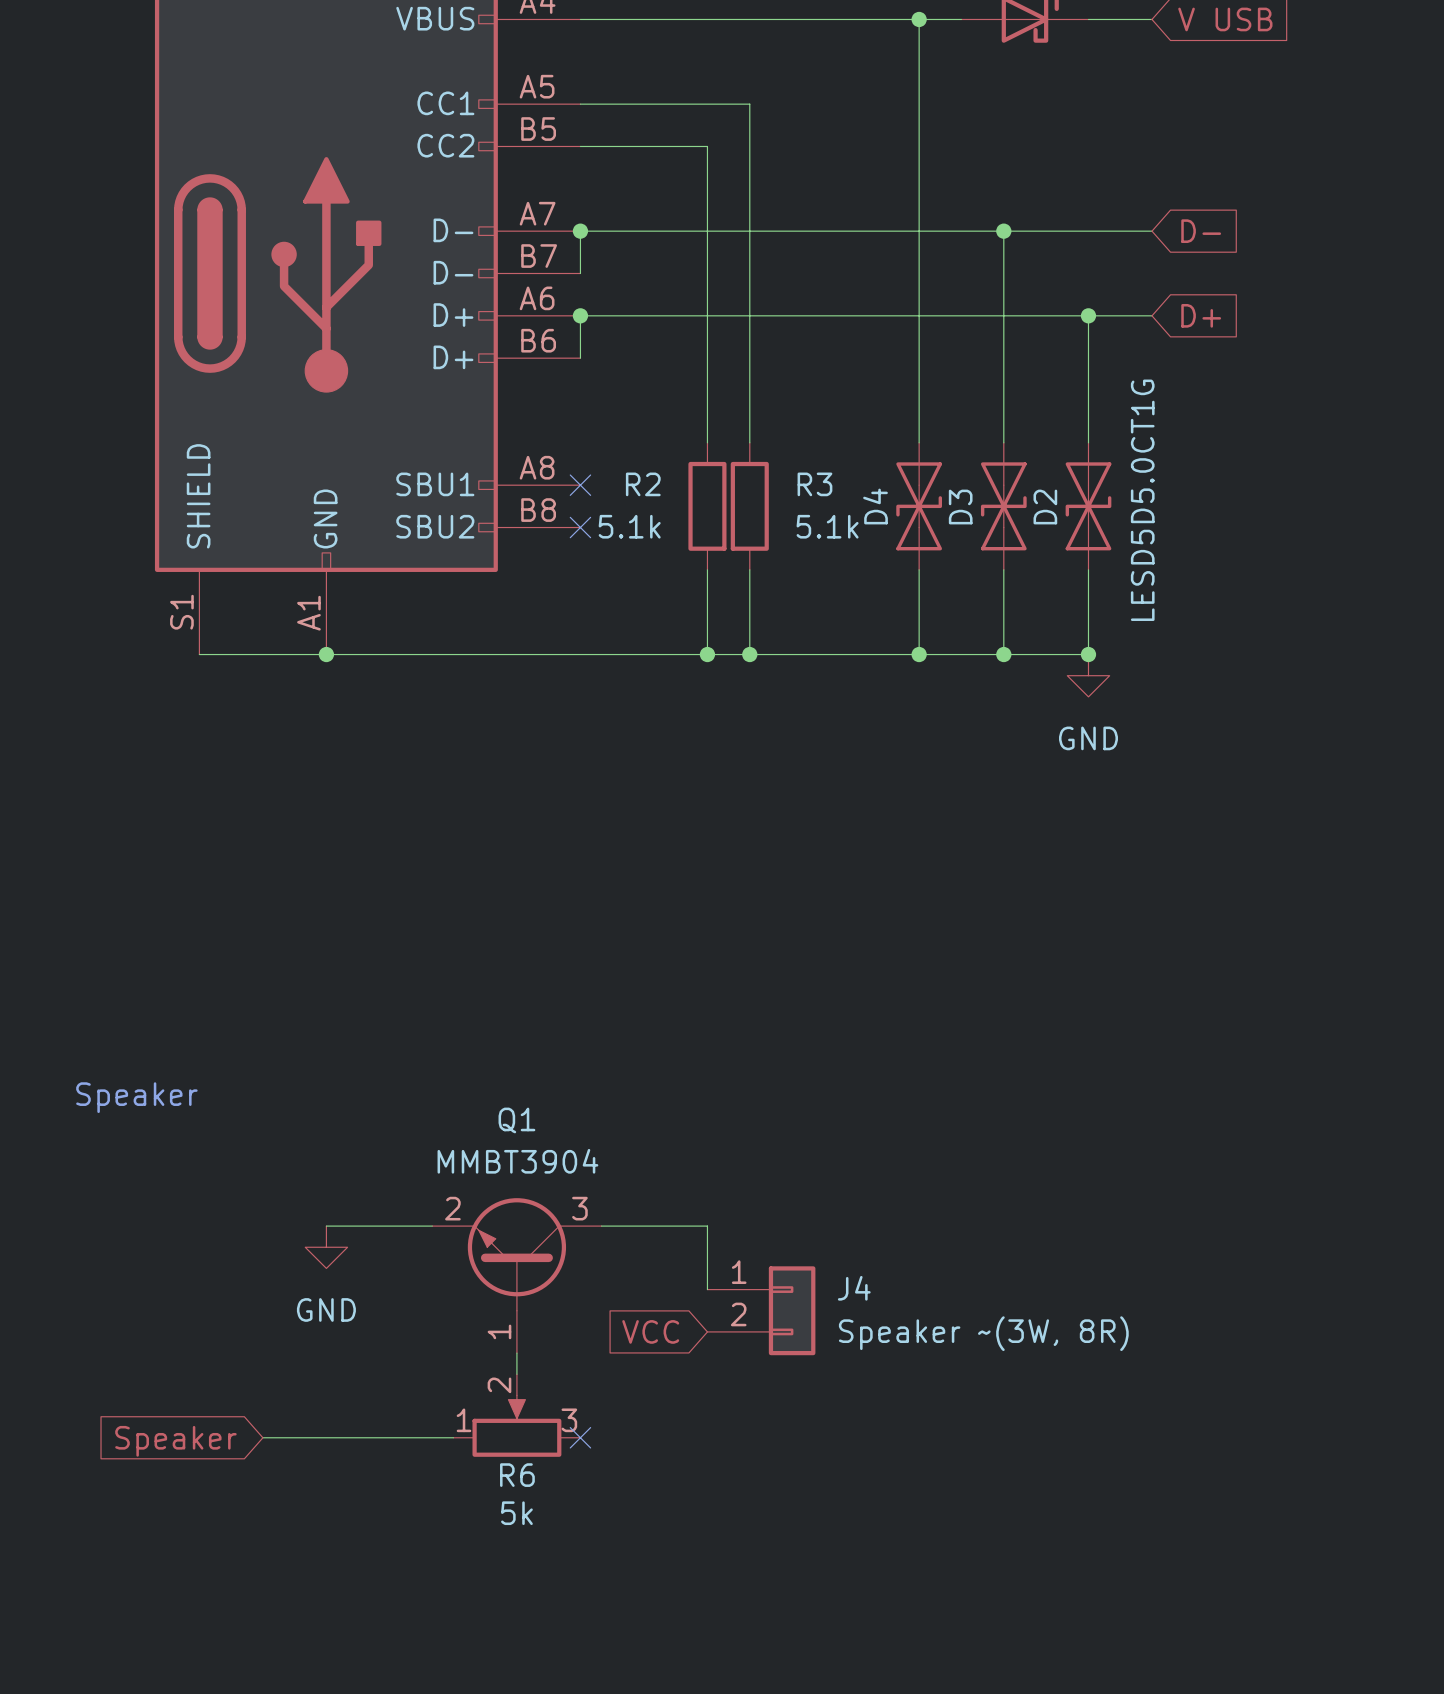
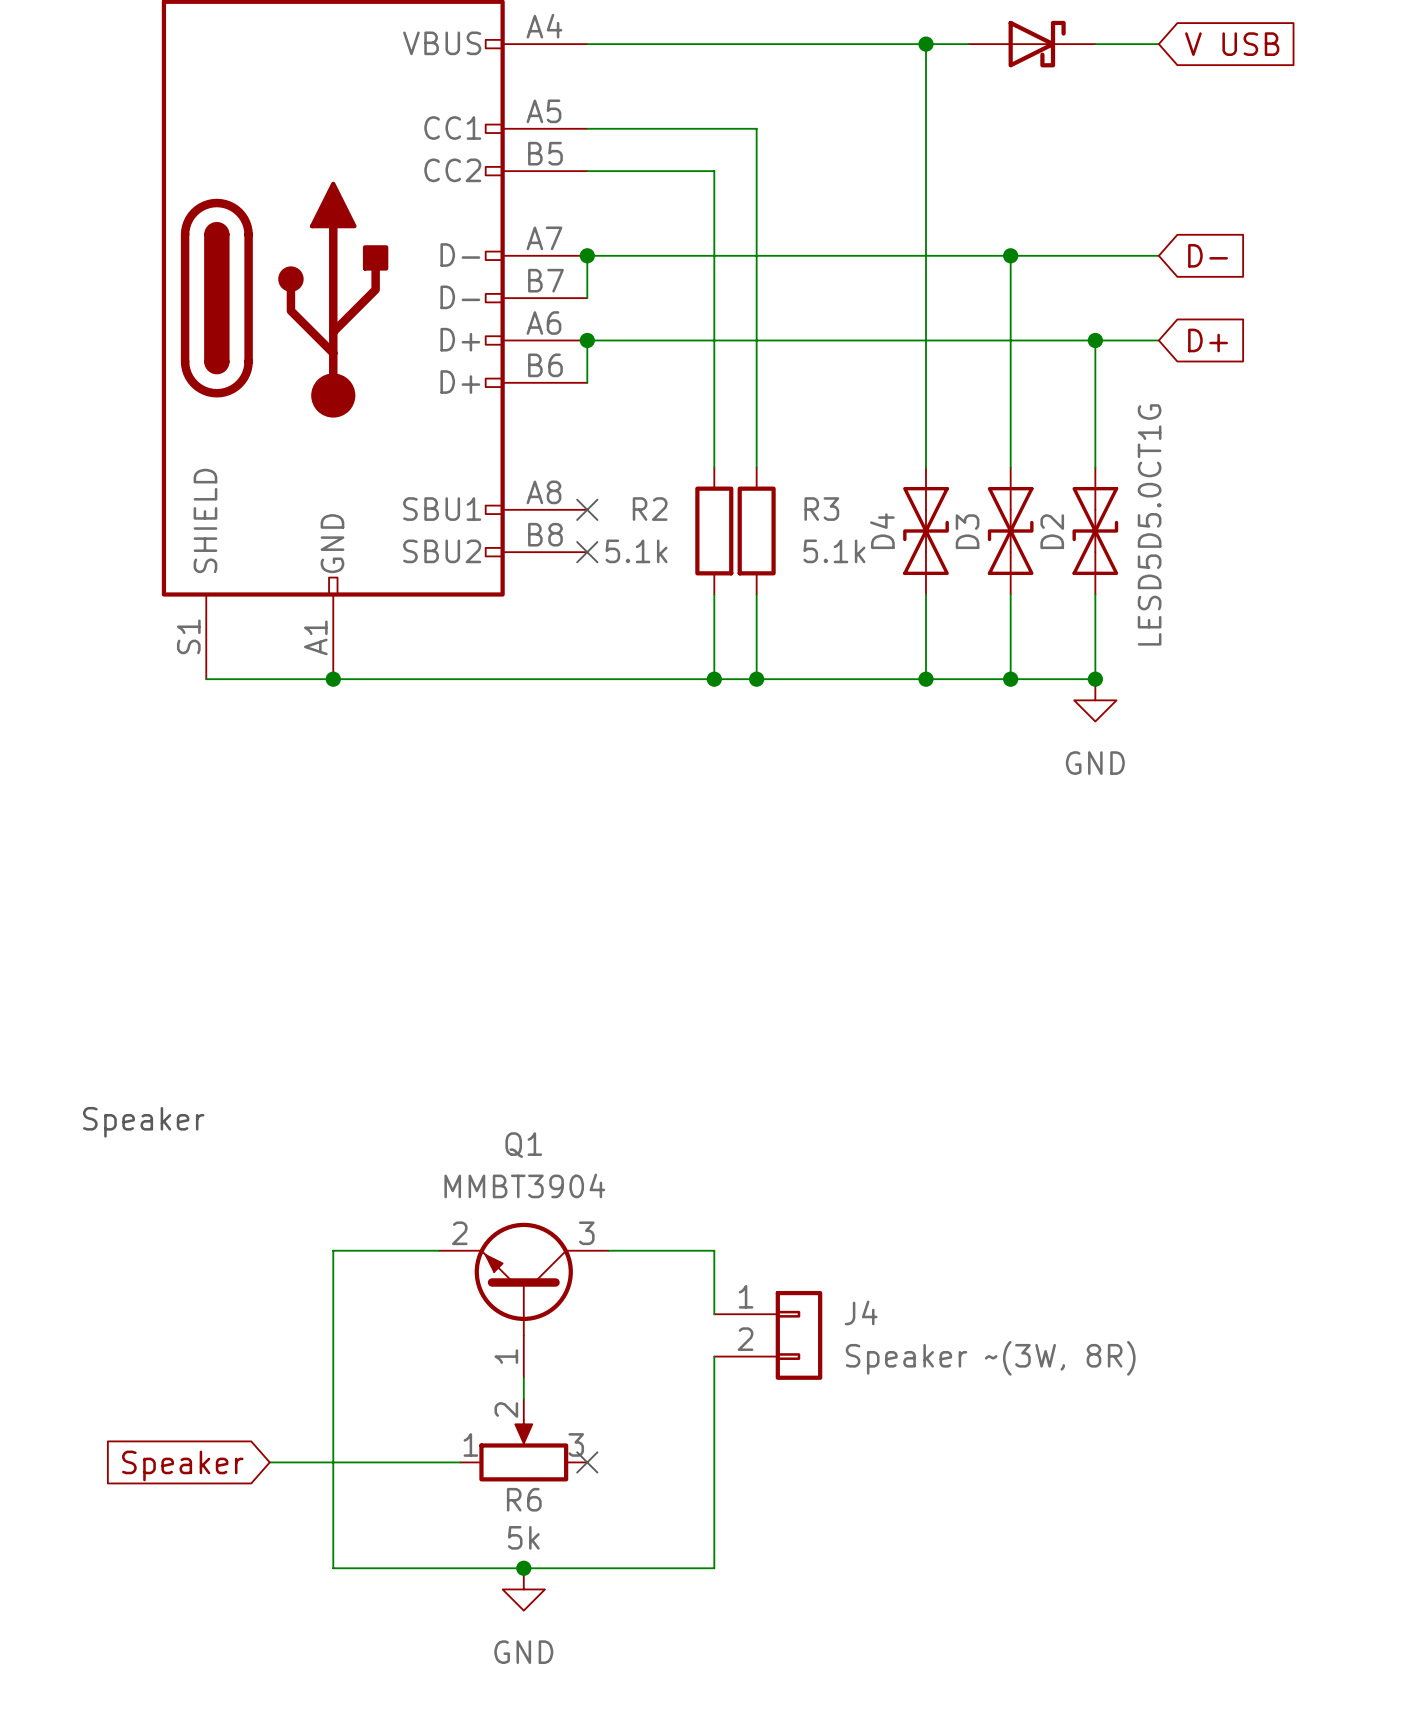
wire: none -> (333, 1250) (333, 1568) (714, 1568) (714, 1356)
power symbol position: GND (326, 1247) -> GND (523, 1589)
global label: VCC (650, 1331) -> none
junction: none -> (523, 1568)

